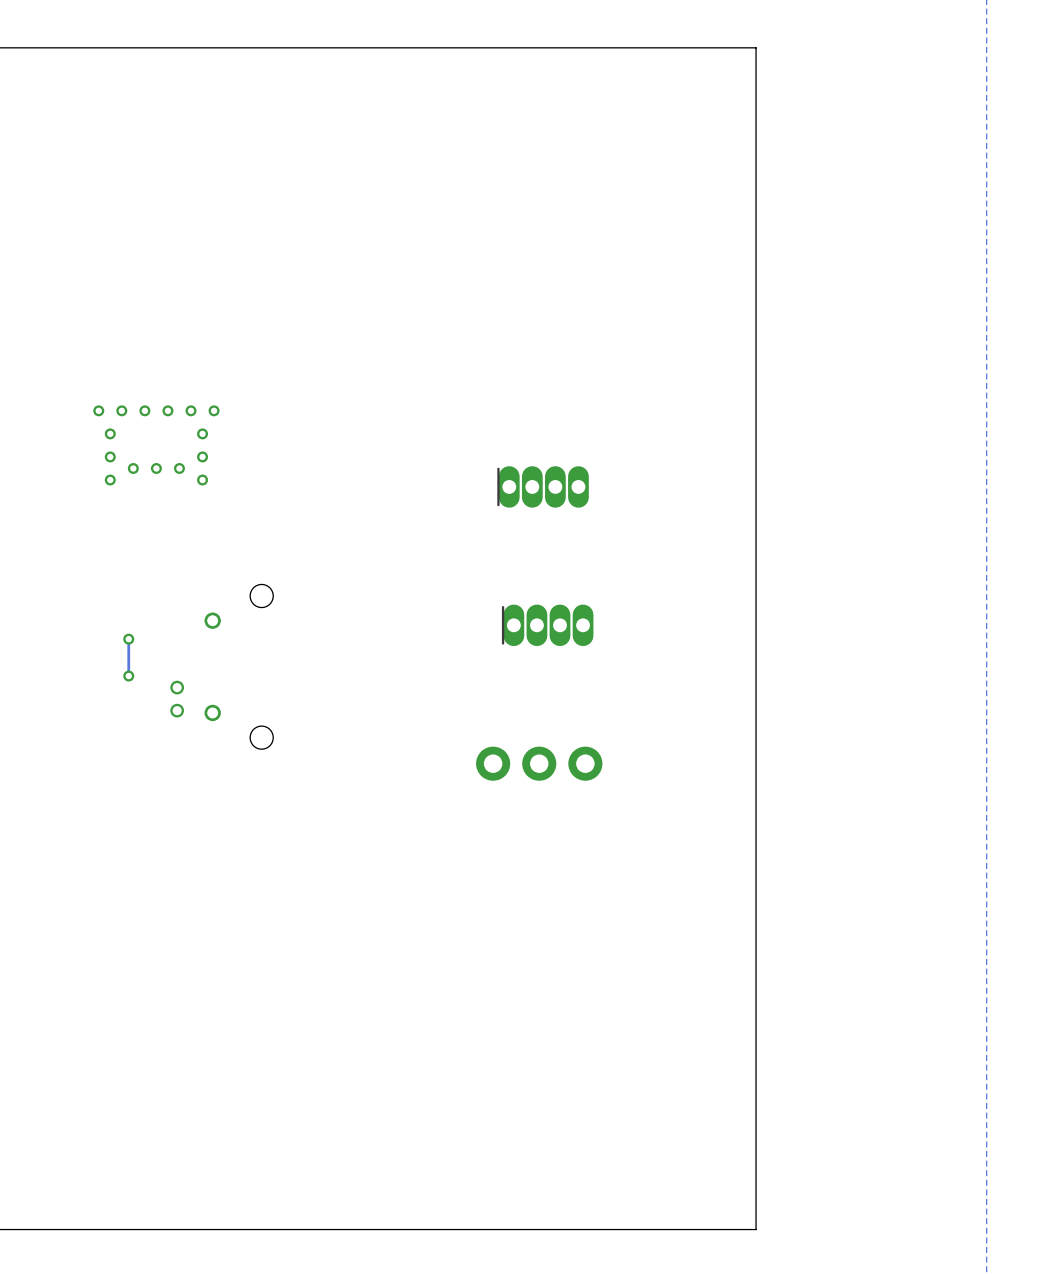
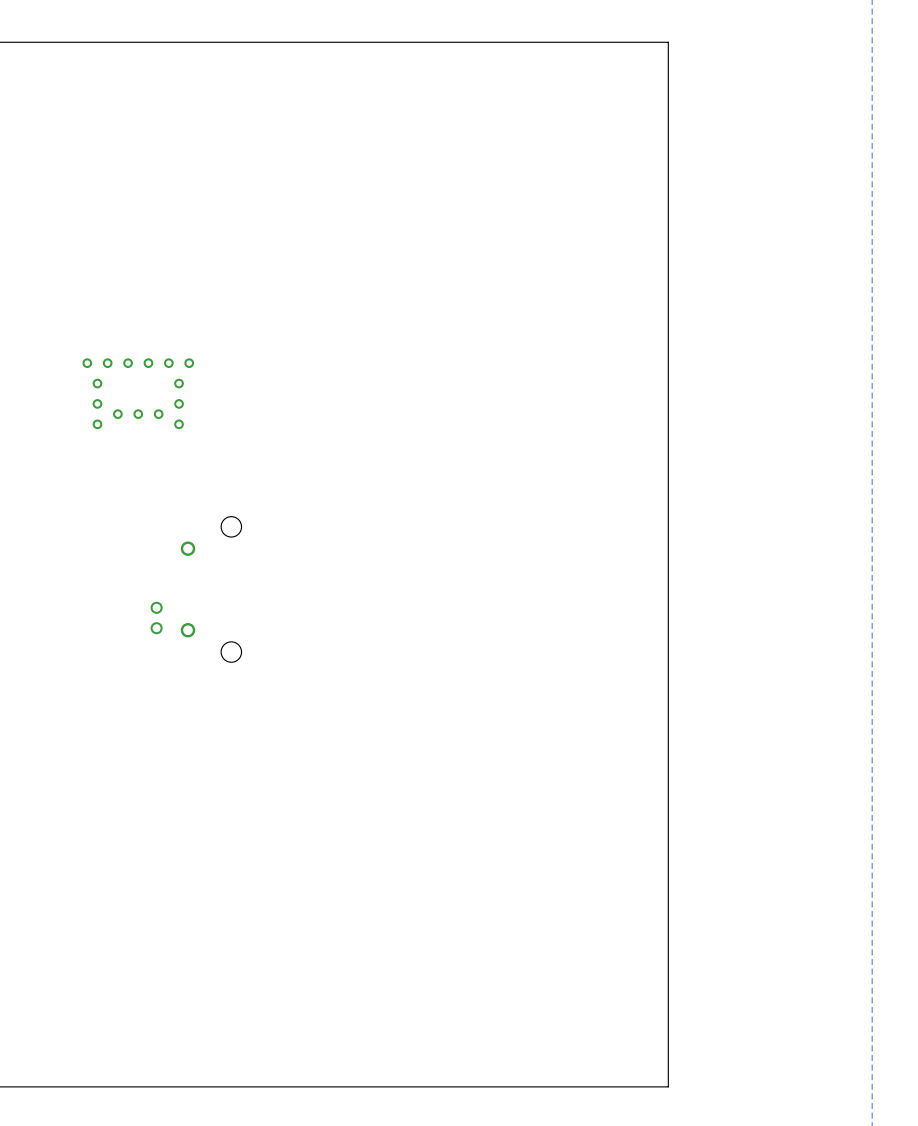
part: (543, 486) -> none
part: (547, 625) -> none
track: (128, 639) (128, 676) -> none
via: (128, 639) -> none
via: (128, 676) -> none
part: (539, 763) -> none

